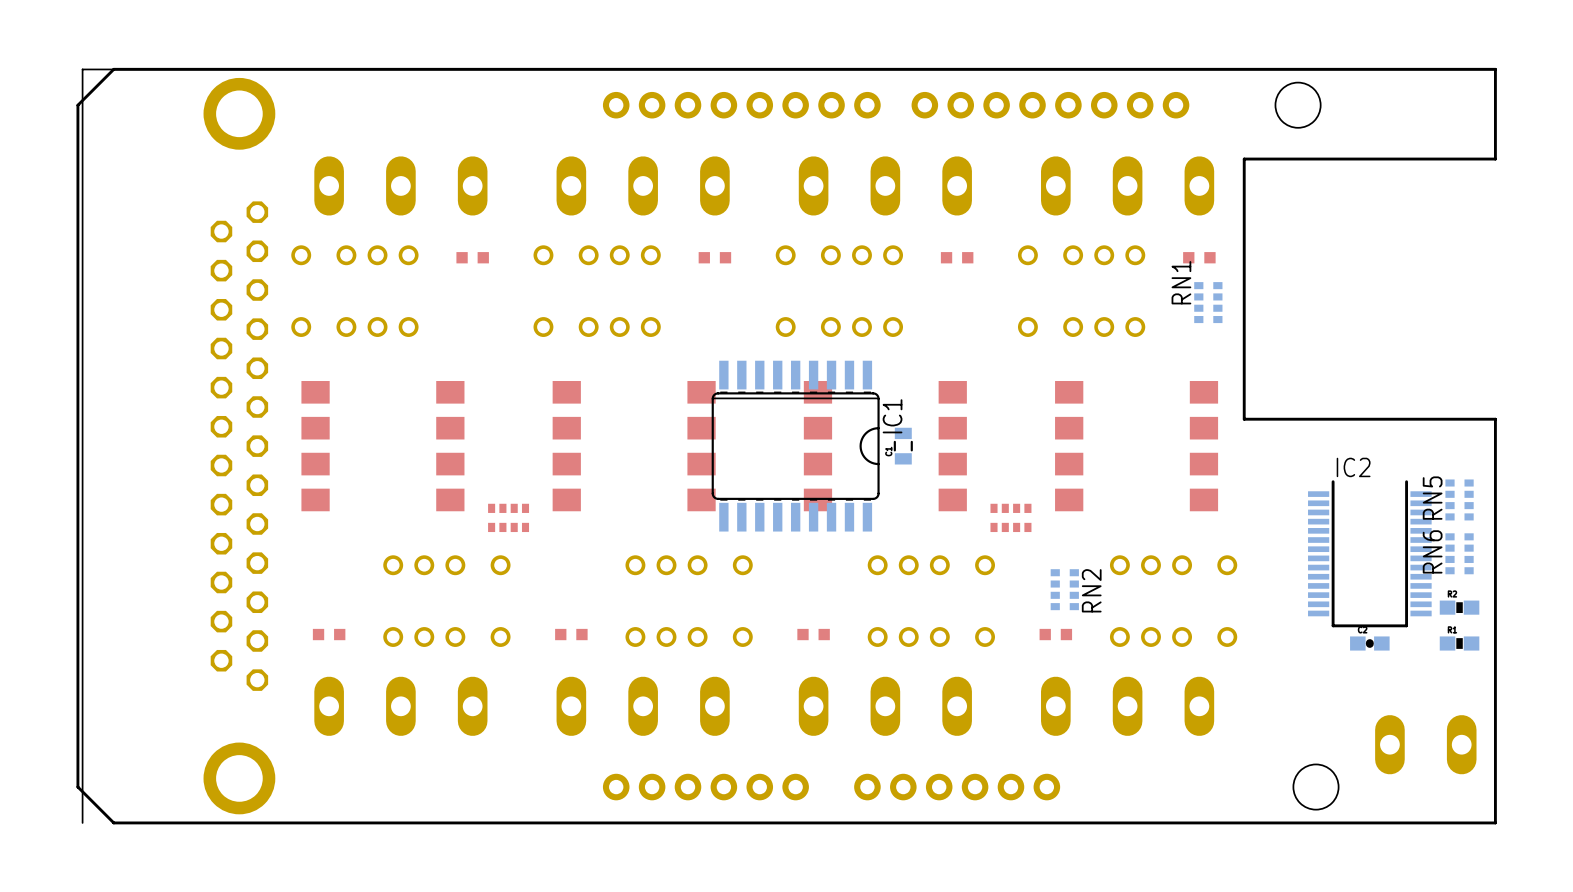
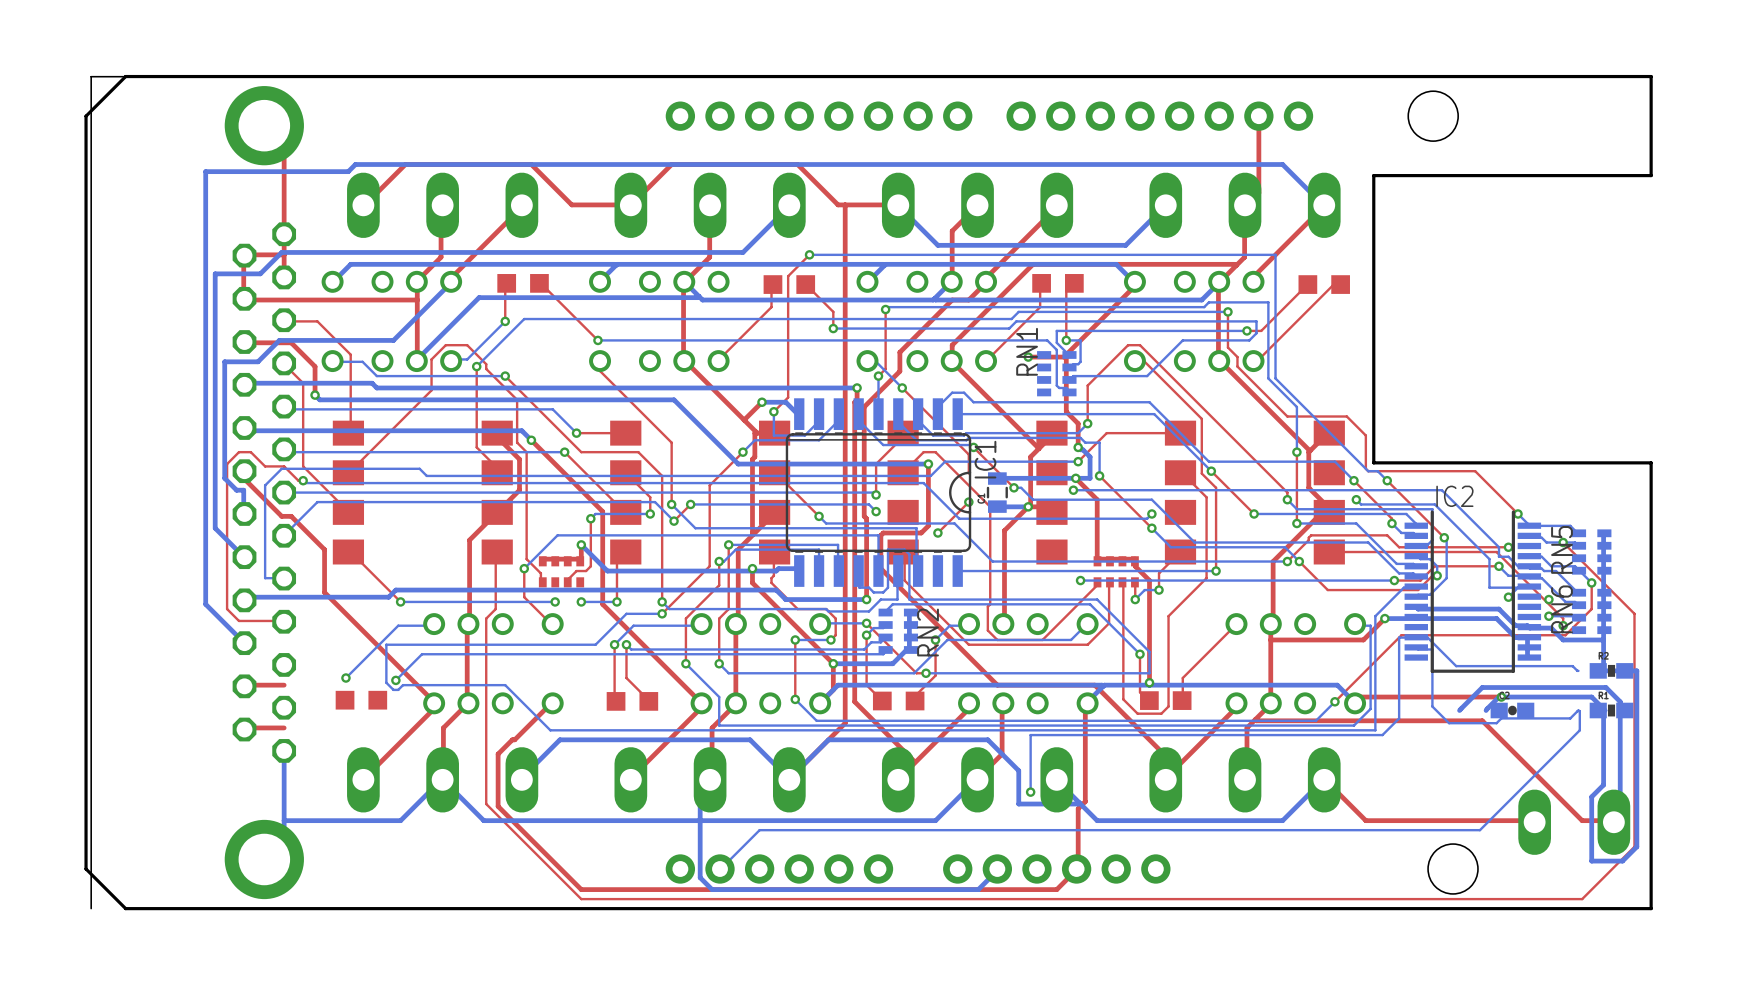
top track: none -> (1258, 116) (1258, 193) (1245, 205) (1244, 257) (1218, 283) (1218, 359) (1309, 450)
top track: none -> (264, 125) (284, 145) (284, 277)
top track: none -> (442, 205) (441, 207) (441, 257) (416, 281) (416, 361)
top track: none -> (521, 205) (452, 276) (451, 281)
top track: none -> (710, 205) (709, 257) (683, 283) (683, 359) (757, 433) (774, 433)
bottom track: none -> (789, 205) (742, 252) (281, 252) (260, 273) (215, 273) (215, 528) (244, 557)
top track: none -> (845, 204) (845, 723) (789, 779)
top track: none -> (898, 205) (838, 204) (797, 164) (671, 164) (630, 205) (571, 204) (531, 164) (405, 164) (363, 205)
top track: none -> (977, 205) (952, 231) (951, 281)
top track: none -> (1056, 205) (987, 276) (987, 280) (968, 300) (952, 300) (899, 352) (899, 371) (864, 406) (866, 599)
bottom track: none -> (1165, 205) (1125, 245) (937, 245) (898, 205)
top track: none -> (1324, 205) (1254, 276) (1253, 281)
bottom track: none -> (1324, 205) (1282, 164) (355, 164) (348, 171) (205, 171) (205, 604) (244, 643)
top track: none -> (284, 254) (244, 255) (244, 298) (417, 300)
top track: none -> (809, 254) (788, 276) (788, 397) (773, 411)
bottom track: none -> (809, 254) (1275, 254) (1275, 378) (1368, 471) (1377, 471) (1387, 480)
via: none -> (809, 254)
bottom track: none -> (615, 265) (350, 264) (332, 281)
bottom track: none -> (884, 265) (616, 264) (600, 281)
top track: none -> (1236, 265) (1033, 264) (952, 345) (951, 361) (1038, 448)
part footprint: [456, 252, 489, 264] -> [497, 274, 549, 293]
part footprint: [698, 252, 732, 264] -> [763, 275, 816, 294]
part footprint: [940, 252, 974, 264] -> [1032, 274, 1084, 293]
part footprint: [1183, 252, 1216, 264] -> [1298, 275, 1350, 294]
bottom track: none -> (451, 281) (393, 340) (279, 340) (257, 361) (224, 361) (224, 478) (236, 490) (243, 490) (244, 513)
bottom track: none -> (951, 281) (933, 300) (702, 300) (684, 281)
top track: none -> (1134, 281) (1132, 288) (1063, 357) (1028, 357)
bottom track: none -> (1134, 281) (1116, 264) (885, 264) (867, 281)
bottom track: none -> (1219, 281) (1201, 300) (934, 298)
top track: none -> (506, 283) (505, 321)
top track: none -> (539, 283) (597, 340)
top track: none -> (1041, 283) (1040, 307) (986, 361)
top track: none -> (1074, 283) (1066, 290) (1066, 340)
top track: none -> (772, 284) (771, 307) (718, 361)
top track: none -> (805, 284) (833, 311) (833, 328)
top track: none -> (1307, 284) (1261, 330) (1246, 330)
top track: none -> (1340, 284) (1332, 285) (1258, 359) (1253, 361)
bottom track: none -> (699, 296) (479, 297) (416, 361)
top track: none -> (885, 309) (885, 368) (878, 376)
bottom track: none -> (885, 309) (888, 307) (1204, 307) (1208, 302) (1268, 302) (1268, 378) (1296, 406) (1296, 452)
via: none -> (885, 309)
top track: none -> (1227, 311) (1227, 347) (1237, 357) (1237, 366) (1287, 416) (1346, 416) (1365, 435) (1365, 468) (1368, 471) (1475, 471) (1518, 513)
bottom track: none -> (1227, 311) (1018, 311) (1011, 319) (524, 319) (476, 366)
via: none -> (1227, 311)
RN1 footprint: [1194, 282, 1223, 324] -> [1037, 351, 1077, 397]
top track: none -> (284, 320) (317, 321) (350, 354) (350, 433) (348, 433)
bottom track: none -> (505, 321) (467, 359) (451, 361)
via: none -> (505, 321)
bottom track: none -> (833, 328) (1009, 328) (1016, 321) (1256, 321) (1256, 333) (1249, 340) (1182, 340) (1147, 376) (1073, 376) (1069, 379)
via: none -> (833, 328)
bottom track: none -> (1246, 330) (1056, 330) (1056, 342) (1069, 354)
via: none -> (1246, 330)
bottom track: none -> (597, 340) (1047, 340) (1056, 349) (1056, 385) (1059, 387) (1066, 387) (1069, 392)
via: none -> (597, 340)
bottom track: none -> (1066, 340) (1080, 340) (1080, 361) (1069, 367)
via: none -> (1066, 340)
top track: none -> (244, 342) (291, 342) (315, 366) (315, 395)
top track: none -> (1065, 355) (1066, 411) (1078, 423) (1078, 447)
via: none -> (1028, 357)
bottom track: none -> (332, 361) (362, 361) (376, 376) (505, 376)
top track: none -> (600, 361) (600, 371) (671, 442) (671, 504)
bottom track: none -> (867, 361) (876, 361) (902, 387)
top track: none -> (1134, 361) (1144, 361) (1201, 418) (1201, 473) (1216, 487) (1216, 571)
top track: none -> (284, 363) (303, 383) (303, 466) (348, 512)
top track: none -> (476, 366) (476, 447) (495, 466) (497, 472)
via: none -> (476, 366)
top track: none -> (505, 376) (581, 452) (638, 452) (662, 475) (662, 601)
via: none -> (505, 376)
bottom track: none -> (878, 376) (878, 414)
via: none -> (878, 376)
bottom track: none -> (244, 384) (246, 383) (372, 383) (376, 387) (857, 387)
top track: none -> (857, 387) (857, 399) (854, 402) (854, 701) (914, 761) (898, 779) (968, 708) (969, 703)
via: none -> (857, 387)
top track: none -> (902, 387) (968, 454) (968, 473)
via: none -> (902, 387)
bottom track: none -> (315, 395) (319, 399) (674, 399) (738, 464) (928, 464)
via: none -> (315, 395)
top track: none -> (762, 402) (744, 420)
bottom track: none -> (762, 402) (785, 402) (799, 414)
via: none -> (762, 402)
bottom track: none -> (284, 406) (286, 409) (552, 409) (576, 433)
bottom track: none -> (773, 411) (773, 435) (804, 435) (819, 421) (819, 414)
via: none -> (773, 411)
bottom track: none -> (838, 414) (838, 421) (819, 440) (754, 440) (742, 452)
bottom track: none -> (858, 414) (859, 421) (883, 445) (971, 445) (973, 447)
bottom track: none -> (898, 414) (899, 414) (899, 423) (916, 440) (966, 440) (968, 437) (1080, 437) (1085, 442) (1099, 442) (1099, 475)
bottom track: none -> (918, 414) (918, 421) (933, 435) (964, 435) (966, 433) (1078, 433) (1087, 423)
bottom track: none -> (937, 414) (937, 406) (952, 392) (964, 392) (973, 402) (1149, 402) (1208, 461) (1334, 461) (1353, 480)
bottom track: none -> (957, 414) (1154, 414) (1211, 471)
top track: none -> (1087, 423) (1087, 385) (1128, 345) (1140, 345) (1287, 492) (1287, 499)
via: none -> (1087, 423)
bottom track: none -> (244, 427) (248, 430) (521, 430) (531, 440)
top track: none -> (756, 431) (754, 456) (752, 459) (753, 534)
top track: none -> (497, 433) (498, 437) (519, 459) (519, 490) (469, 540) (469, 623) (467, 625) (468, 703) (443, 727) (442, 779)
via: none -> (576, 433)
top track: none -> (625, 433) (576, 433)
top track: none -> (903, 433) (902, 437) (876, 464) (876, 494)
top track: none -> (1051, 433) (1049, 433) (1049, 437) (1030, 456) (1030, 506)
top track: none -> (1180, 433) (1106, 433) (1078, 461)
top track: none -> (1329, 433) (1308, 452) (1308, 487) (1327, 506)
top track: none -> (531, 440) (602, 511) (602, 604) (701, 703) (700, 708) (630, 779)
via: none -> (531, 440)
top track: none -> (973, 447) (1014, 487)
via: none -> (973, 447)
bottom track: none -> (1078, 447) (1090, 456) (1090, 478) (997, 478)
via: none -> (1078, 447)
bottom track: none -> (284, 449) (286, 452) (564, 452)
top track: none -> (564, 452) (625, 512)
via: none -> (564, 452)
top track: none -> (742, 452) (709, 485) (709, 566) (662, 613)
via: none -> (742, 452)
top track: none -> (1296, 452) (1296, 523)
via: none -> (1296, 452)
bottom track: none -> (1078, 461) (945, 461) (930, 475) (426, 475) (419, 468) (281, 468) (265, 485) (265, 578) (284, 578)
via: none -> (1078, 461)
top track: none -> (928, 464) (928, 525) (921, 532) (883, 532) (880, 535) (880, 568) (997, 685) (1094, 685) (1175, 765) (1165, 779) (1235, 708) (1236, 703)
via: none -> (928, 464)
top track: none -> (244, 471) (246, 471) (246, 480) (281, 516) (291, 516) (324, 549) (324, 592) (433, 701) (433, 708) (363, 779)
top track: none -> (1211, 471) (1254, 513)
via: none -> (1211, 471)
top track: none -> (348, 472) (431, 390) (431, 359) (445, 345) (467, 345) (486, 364) (486, 368) (517, 399) (517, 442) (526, 452) (526, 559) (540, 573) (540, 582) (542, 584)
top track: none -> (625, 472) (650, 497) (650, 513)
top track: none -> (774, 472) (819, 516)
top track: none -> (903, 472) (923, 452) (935, 452) (990, 506) (990, 604) (987, 606) (987, 630) (997, 639) (1042, 639) (1097, 584)
top track: none -> (1180, 472) (1206, 497) (1206, 578) (1168, 616) (1168, 706) (1161, 713) (1137, 713) (1123, 699) (1122, 584)
top track: none -> (1099, 475) (1151, 528)
via: none -> (1099, 475)
top track: none -> (1075, 478) (1097, 499) (1097, 559) (1135, 559) (1135, 566) (1149, 580) (1149, 682)
via: none -> (1075, 478)
top track: none -> (303, 480) (298, 480) (284, 466) (265, 466) (250, 452) (238, 452) (227, 464) (227, 609) (238, 620) (284, 621)
bottom track: none -> (303, 480) (305, 483) (923, 483) (959, 518) (1147, 518) (1151, 513)
via: none -> (303, 480)
top track: none -> (1353, 480) (1392, 518) (1392, 523)
via: none -> (1353, 480)
top track: none -> (1387, 480) (1444, 537)
via: none -> (1387, 480)
bottom track: none -> (1014, 487) (1021, 487) (1033, 499) (1151, 499) (1194, 542) (1368, 542) (1399, 573) (1413, 573) (1416, 576)
via: none -> (1014, 487)
bottom track: none -> (1073, 490) (1441, 490) (1498, 547) (1498, 556) (1508, 556) (1518, 566) (1556, 571) (1579, 592)
via: none -> (1073, 490)
bottom track: none -> (284, 492) (873, 492) (876, 494)
via: none -> (876, 494)
bottom track: none -> (1287, 499) (1296, 509) (1432, 509) (1432, 540) (1427, 544) (1416, 546)
via: none -> (1287, 499)
bottom track: none -> (1356, 499) (1361, 504) (1434, 504) (1489, 559) (1489, 587) (1529, 586) (1518, 587) (1508, 597)
via: none -> (1356, 499)
top track: none -> (968, 502) (937, 532)
via: none -> (968, 502)
bottom track: none -> (671, 504) (695, 528) (916, 528) (916, 571) (918, 571)
via: none -> (671, 504)
top track: none -> (690, 504) (674, 521)
bottom track: none -> (690, 504) (868, 504) (876, 511)
via: none -> (690, 504)
bottom track: none -> (1028, 506) (997, 506)
via: none -> (1028, 506)
top track: none -> (1327, 506) (1273, 561) (1270, 704) (1246, 727) (1246, 777) (1245, 779)
via: none -> (876, 511)
top track: none -> (774, 512) (738, 549) (735, 704) (712, 727) (712, 777) (710, 779)
top track: none -> (1051, 512) (1044, 506) (1028, 506) (1004, 530) (1003, 624)
bottom track: none -> (650, 513) (595, 513) (590, 518)
via: none -> (650, 513)
via: none -> (1151, 513)
bottom track: none -> (1254, 513) (1406, 513) (1416, 525)
via: none -> (1254, 513)
bottom track: none -> (1518, 513) (1529, 525) (1570, 525) (1579, 533)
via: none -> (1518, 513)
bottom track: none -> (819, 516) (826, 523) (954, 523) (992, 561) (1287, 561)
via: none -> (819, 516)
top track: none -> (590, 518) (590, 566) (586, 571) (576, 571) (569, 578) (567, 584)
via: none -> (590, 518)
bottom track: none -> (674, 521) (655, 502) (317, 502) (284, 535)
via: none -> (674, 521)
bottom track: none -> (1296, 523) (1356, 523) (1396, 563) (1413, 563) (1416, 566)
via: none -> (1296, 523)
bottom track: none -> (1392, 523) (1401, 532) (1413, 532) (1416, 535)
via: none -> (1392, 523)
bottom track: none -> (1151, 528) (1170, 547) (1285, 547) (1299, 561)
via: none -> (1151, 528)
RN5 footprint: [1445, 479, 1474, 521] -> [1571, 529, 1612, 575]
via: none -> (937, 532)
bottom track: none -> (1604, 533) (1603, 670) (1636, 670) (1636, 846) (1622, 861) (1591, 861) (1591, 796) (1603, 784) (1604, 710) (1591, 697) (1498, 697) (1486, 710)
bottom track: none -> (1529, 535) (1529, 537) (1541, 537) (1546, 542) (1575, 542) (1579, 545)
bottom track: none -> (1444, 537) (1446, 537) (1446, 578) (1430, 594) (1418, 594) (1416, 596)
via: none -> (1444, 537)
top track: none -> (1563, 542) (1634, 613) (1634, 846) (1582, 899) (581, 899) (486, 804) (486, 618) (495, 609) (495, 552) (497, 552)
via: none -> (1563, 542)
top track: none -> (581, 544) (581, 559) (542, 559)
bottom track: none -> (581, 544) (607, 571) (776, 571) (778, 568) (795, 568) (799, 571)
via: none -> (581, 544)
top track: none -> (728, 544) (728, 609) (719, 618) (719, 663)
bottom track: none -> (728, 544) (838, 544) (838, 571)
via: none -> (728, 544)
top track: none -> (1508, 547) (1399, 547) (1387, 535) (1311, 535) (1287, 561)
via: none -> (1508, 547)
top track: none -> (348, 552) (350, 552) (400, 601)
top track: none -> (625, 552) (616, 559) (616, 601)
top track: none -> (774, 552) (773, 575) (771, 578) (771, 582) (797, 609) (826, 609) (835, 618) (835, 635) (830, 639)
top track: none -> (903, 552) (904, 552) (904, 580) (968, 644) (1087, 644) (1109, 623) (1109, 584)
top track: none -> (1180, 552) (1159, 573) (1159, 590)
top track: none -> (1329, 552) (1496, 552) (1563, 618) (1563, 625)
bottom track: none -> (1416, 556) (1420, 559) (1430, 559) (1437, 566) (1437, 575)
bottom track: none -> (1529, 556) (1541, 556) (1551, 566) (1575, 566) (1591, 582)
top track: none -> (719, 561) (719, 585) (685, 618) (685, 663)
bottom track: none -> (719, 561) (723, 561) (735, 549) (819, 549) (819, 571)
via: none -> (719, 561)
via: none -> (1287, 561)
top track: none -> (1299, 561) (1327, 590) (1418, 590) (1432, 575) (1437, 575)
via: none -> (1299, 561)
top track: none -> (1498, 566) (1434, 566) (1420, 580) (1394, 580)
bottom track: none -> (1498, 566) (1508, 575) (1541, 578) (1565, 601) (1575, 601) (1579, 605)
via: none -> (1498, 566)
top track: none -> (524, 568) (524, 597) (552, 624)
bottom track: none -> (524, 568) (557, 535) (878, 535) (878, 571)
via: none -> (524, 568)
top track: none -> (752, 568) (752, 582) (833, 663) (833, 689) (820, 703)
via: none -> (752, 568)
bottom track: none -> (858, 571) (859, 587) (868, 587) (873, 592) (883, 592) (888, 587) (888, 549) (904, 549) (909, 554) (909, 599) (1097, 599) (1149, 651) (1149, 673) (926, 673)
bottom track: none -> (898, 571) (897, 599) (880, 599) (868, 611) (828, 611) (826, 609) (669, 609) (662, 601)
bottom track: none -> (1216, 571) (957, 571)
via: none -> (1216, 571)
via: none -> (1437, 575)
via: none -> (1080, 580)
bottom track: none -> (1394, 580) (1080, 580)
via: none -> (1394, 580)
top track: none -> (1591, 582) (1591, 609) (1565, 635) (1401, 635) (1334, 701)
via: none -> (1591, 582)
top track: none -> (1134, 584) (1135, 599)
bottom track: none -> (1416, 586) (1403, 587) (1375, 616) (1375, 730) (550, 730) (505, 685) (403, 685) (398, 689) (393, 689) (386, 682) (386, 644) (595, 644) (626, 613) (662, 613)
RN6 footprint: [1445, 533, 1474, 575] -> [1571, 588, 1612, 635]
bottom track: none -> (1159, 590) (1144, 590) (1135, 599)
via: none -> (1159, 590)
via: none -> (1508, 597)
bottom track: none -> (866, 599) (785, 599) (776, 590) (395, 590) (388, 597) (248, 597) (244, 600)
via: none -> (866, 599)
via: none -> (1135, 599)
via: none -> (1548, 599)
via: none -> (400, 601)
bottom track: none -> (555, 601) (400, 601)
via: none -> (555, 601)
via: none -> (581, 601)
bottom track: none -> (616, 601) (581, 601)
via: none -> (616, 601)
via: none -> (662, 601)
bottom track: none -> (1416, 606) (1418, 609) (1498, 609) (1515, 625) (1551, 628) (1563, 639) (1603, 639)
IC2 position: (1369, 553) -> (1472, 591)
bottom track: none -> (885, 612) (892, 604) (1090, 604) (1140, 654)
bottom track: none -> (910, 612) (909, 613) (910, 625) (909, 625) (910, 637) (909, 637) (909, 649) (910, 649) (907, 649) (892, 663) (833, 663)
via: none -> (662, 613)
bottom track: none -> (1548, 616) (1579, 617)
via: none -> (1548, 616)
top track: none -> (1384, 618) (1363, 639) (1270, 639)
bottom track: none -> (1384, 618) (1415, 618) (1416, 616) (1418, 618) (1496, 618) (1515, 637) (1529, 637) (1527, 637) (1527, 647) (1529, 647) (1527, 656) (1529, 657)
via: none -> (1384, 618)
top track: none -> (866, 623) (916, 673) (926, 673)
bottom track: none -> (866, 623) (820, 624)
via: none -> (866, 623)
bottom track: none -> (434, 624) (433, 625) (398, 625) (345, 678)
bottom track: none -> (701, 624) (700, 625) (633, 625) (614, 644)
bottom track: none -> (969, 624) (968, 625) (949, 625) (935, 639)
bottom track: none -> (1087, 624) (1071, 639) (947, 639) (914, 673) (728, 673) (719, 663)
top track: none -> (1236, 624) (1182, 678) (1182, 700)
bottom track: none -> (1355, 624) (1370, 625) (1370, 708) (1353, 725) (719, 725) (719, 697) (685, 663)
bottom track: none -> (885, 625) (883, 628) (873, 628) (866, 635)
via: none -> (1563, 625)
RN2 footprint: [1050, 569, 1079, 611] -> [878, 608, 919, 654]
top track: none -> (866, 635) (866, 685) (882, 700)
via: none -> (866, 635)
bottom track: none -> (885, 637) (880, 642) (871, 642) (864, 649) (631, 649) (626, 644)
top track: none -> (795, 639) (795, 699)
via: none -> (795, 639)
bottom track: none -> (830, 639) (795, 639)
via: none -> (830, 639)
top track: none -> (935, 639) (935, 675) (916, 694) (915, 700)
via: none -> (935, 639)
top track: none -> (614, 644) (616, 701)
via: none -> (614, 644)
top track: none -> (626, 644) (626, 678) (648, 701)
via: none -> (626, 644)
bottom track: none -> (1416, 647) (1418, 649) (1432, 649) (1432, 706) (1449, 723) (1496, 723) (1501, 718) (1570, 718) (1579, 711) (1579, 730) (1479, 830) (759, 830) (720, 868)
bottom track: none -> (885, 649) (883, 654) (422, 654) (395, 680)
top track: none -> (1140, 654) (1140, 692) (1149, 700)
via: none -> (1140, 654)
via: none -> (685, 663)
via: none -> (719, 663)
via: none -> (833, 663)
bottom track: none -> (1578, 670) (1572, 666) (1456, 666) (1427, 637) (1399, 637) (1399, 718) (1382, 735) (1030, 735) (1030, 792)
via: none -> (926, 673)
via: none -> (345, 678)
via: none -> (395, 680)
via: none -> (1149, 682)
top track: none -> (284, 685) (244, 686)
bottom track: none -> (1103, 686) (838, 685) (820, 703)
part footprint: [312, 628, 346, 641] -> [335, 690, 388, 710]
part footprint: [555, 628, 588, 641] -> [606, 692, 659, 711]
part footprint: [797, 628, 830, 641] -> [872, 691, 925, 711]
part footprint: [1039, 628, 1073, 641] -> [1140, 691, 1192, 710]
top track: none -> (1501, 697) (1361, 697) (1355, 703)
via: none -> (1501, 697)
bottom track: none -> (795, 699) (816, 720) (1315, 720) (1334, 701)
via: none -> (795, 699)
via: none -> (1334, 701)
top track: none -> (1003, 703) (1002, 754) (977, 779)
top track: none -> (1087, 703) (1085, 704) (1085, 801) (1078, 808) (1078, 868) (1056, 889) (581, 889) (498, 806) (498, 754) (552, 703)
bottom track: none -> (1355, 703) (1337, 685) (1104, 685) (1087, 703)
bottom track: none -> (1459, 710) (1482, 687) (1605, 687) (1620, 701) (1620, 820) (1613, 822)
top track: none -> (1255, 719) (1482, 720) (1582, 820) (1613, 820) (1613, 822)
top track: none -> (284, 727) (246, 727) (244, 729)
bottom track: none -> (284, 750) (284, 858) (264, 859)
bottom track: none -> (521, 779) (559, 739) (750, 739) (789, 779) (828, 739) (987, 739) (1018, 770) (1018, 804) (1079, 802)
bottom track: none -> (710, 779) (700, 780) (700, 877) (712, 889) (978, 889) (997, 868)
bottom track: none -> (977, 779) (935, 820) (483, 820) (442, 779) (400, 820) (284, 820)
top track: none -> (1324, 779) (1365, 820) (1534, 820) (1534, 822)
bottom track: none -> (1324, 779) (1282, 820) (1097, 820) (1056, 779)
via: none -> (1030, 792)

